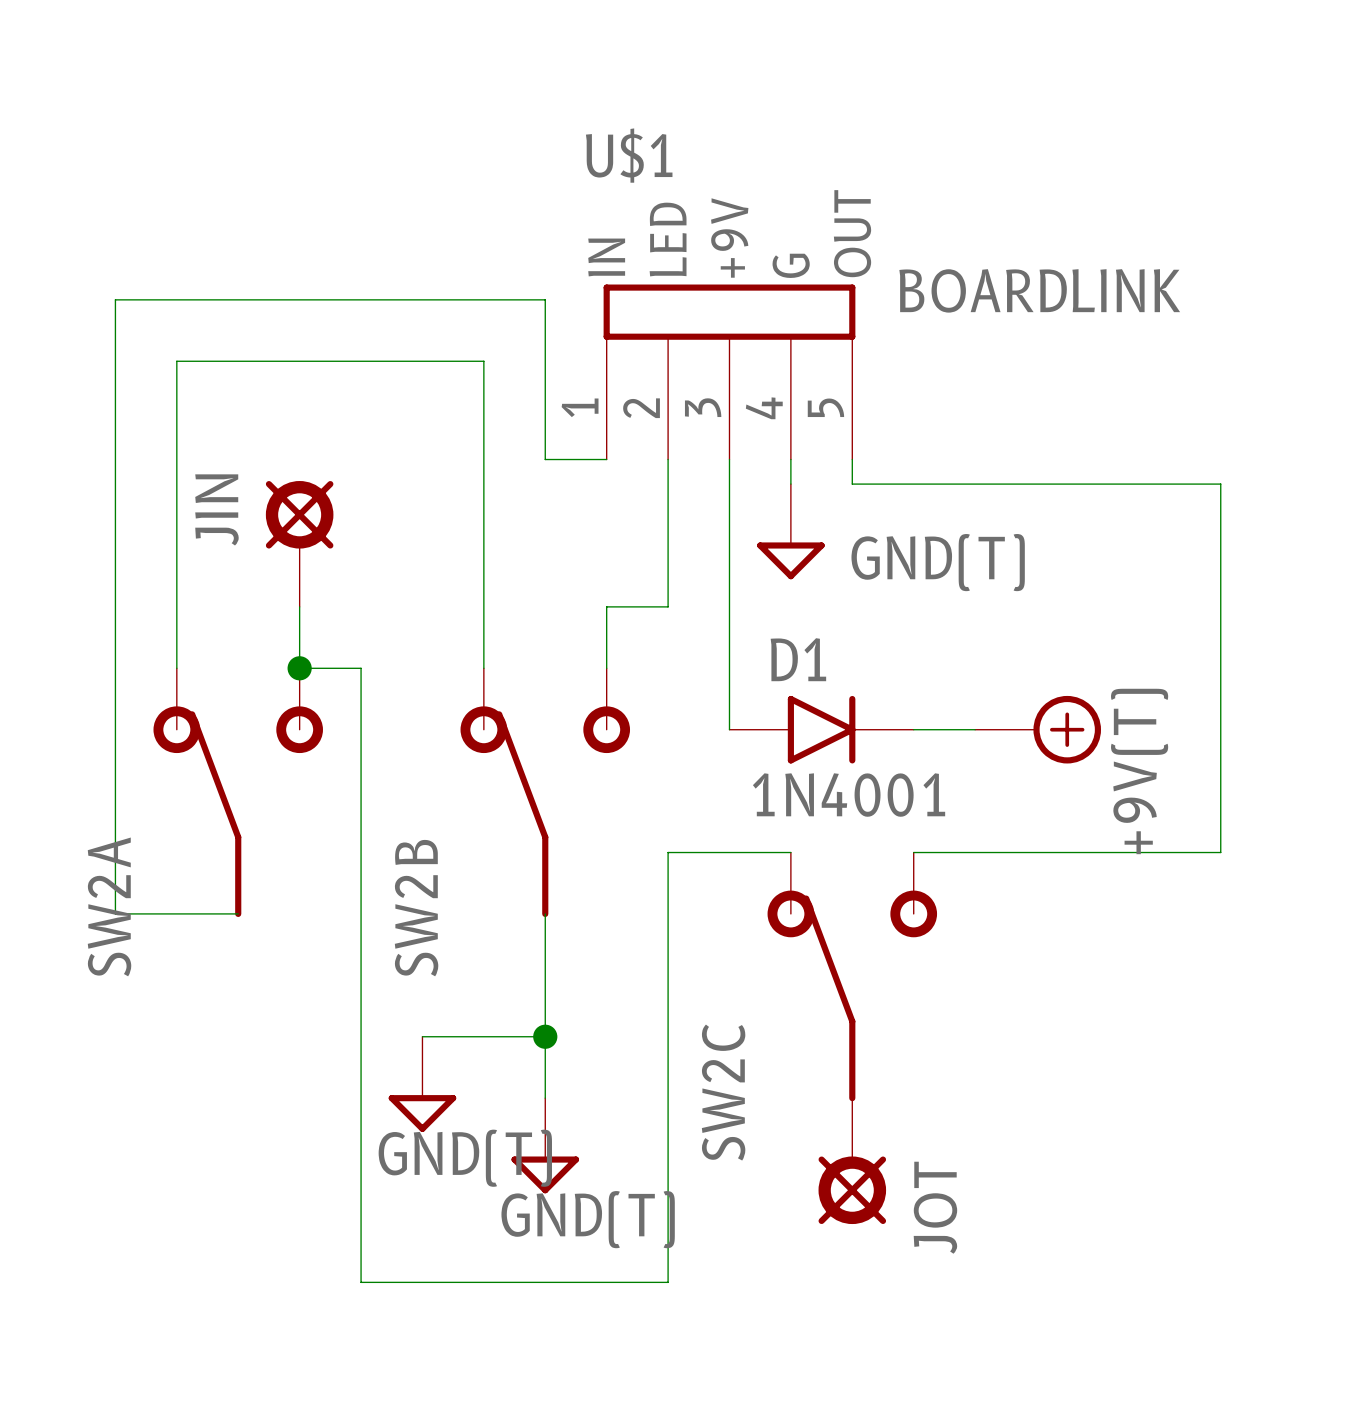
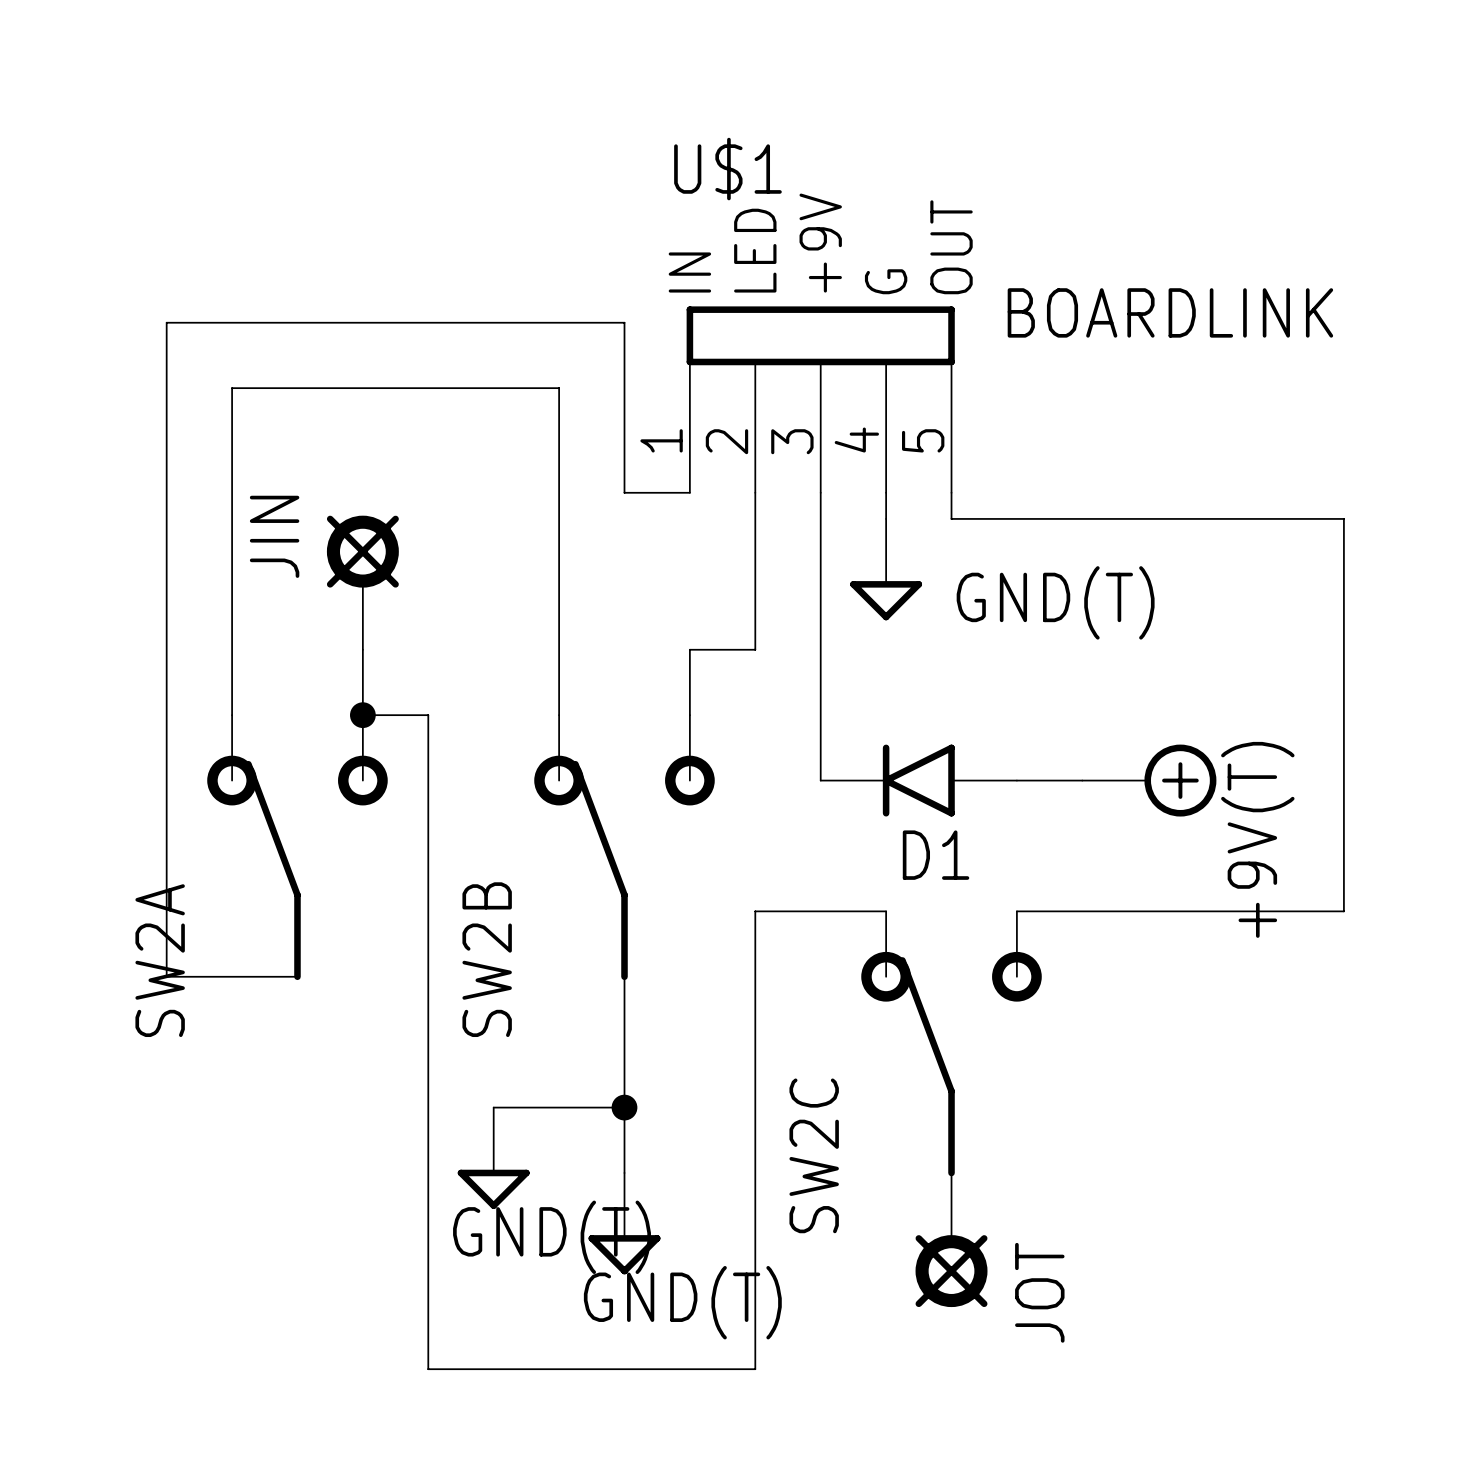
D1 rotation: 0° (821, 729) -> 180° (918, 780)
D1 value: 1N4001 (849, 795) -> none

